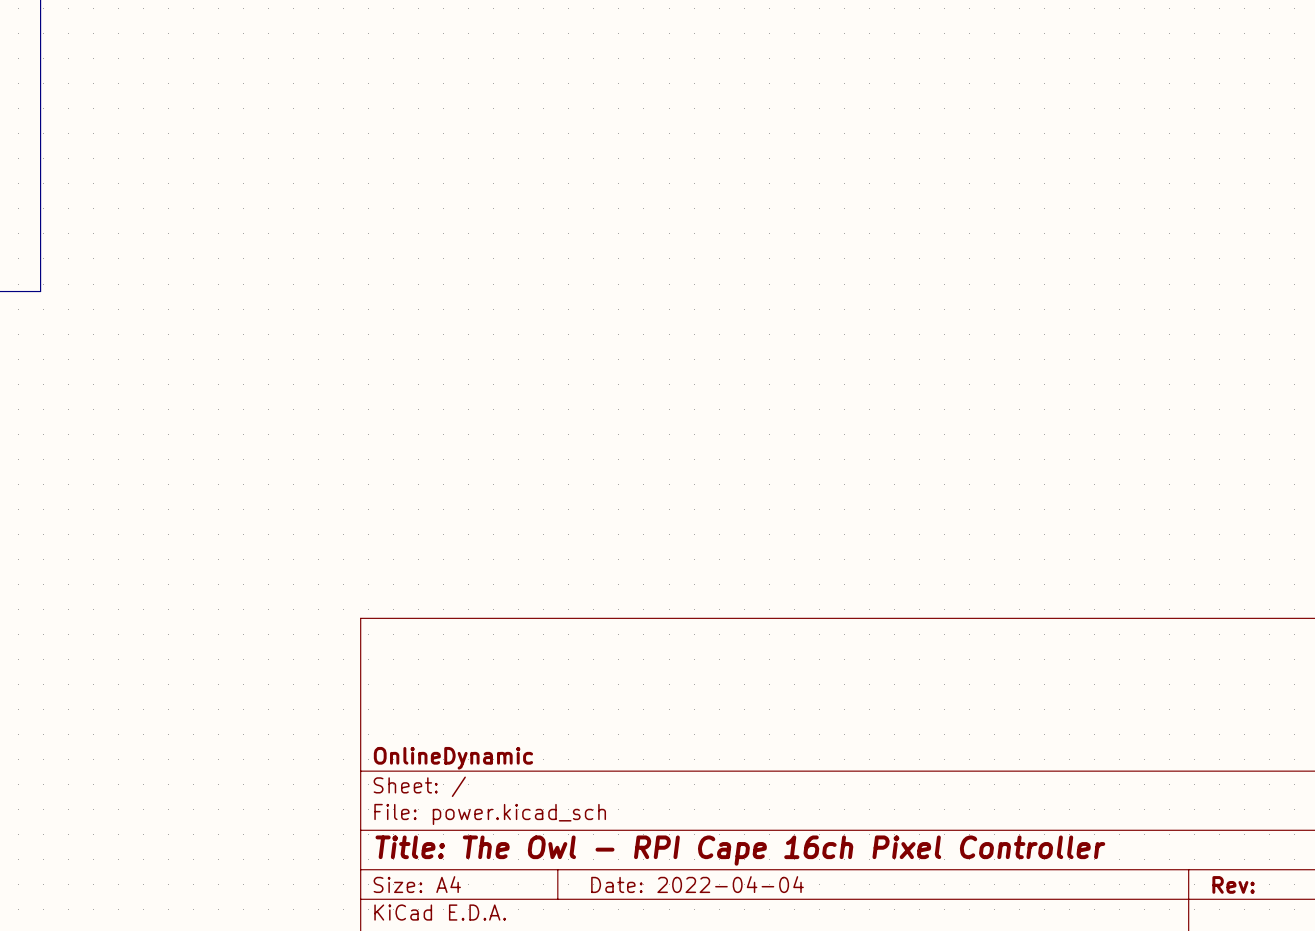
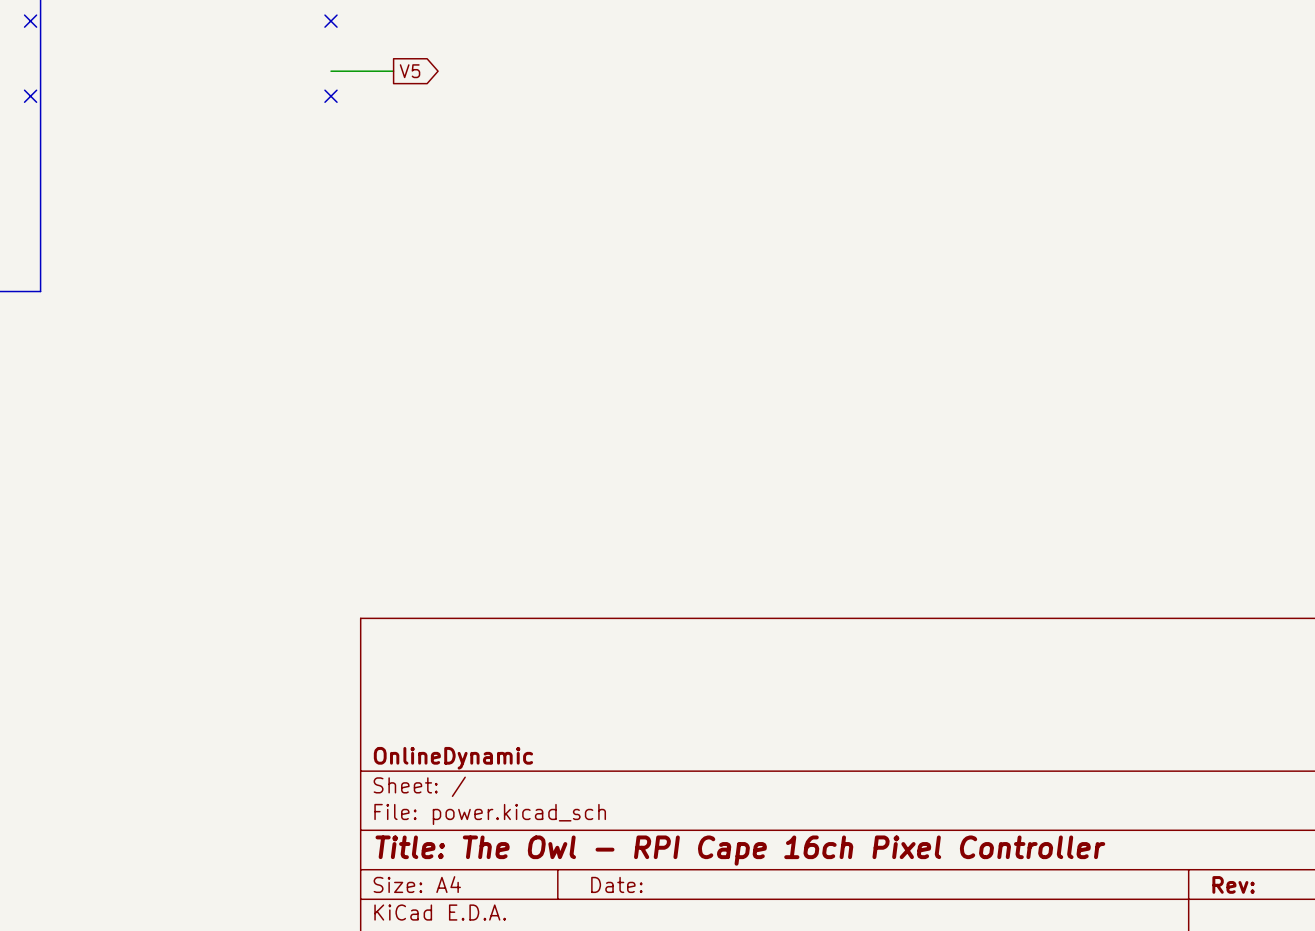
no-connect mark: none -> (30, 21)
no-connect mark: none -> (331, 21)
wire: none -> (331, 71) (393, 71)
global label: none -> V5 (410, 71)
no-connect mark: none -> (30, 96)
no-connect mark: none -> (331, 96)
title block: Date: 2022-04-04 (697, 884) -> Date: (616, 884)

